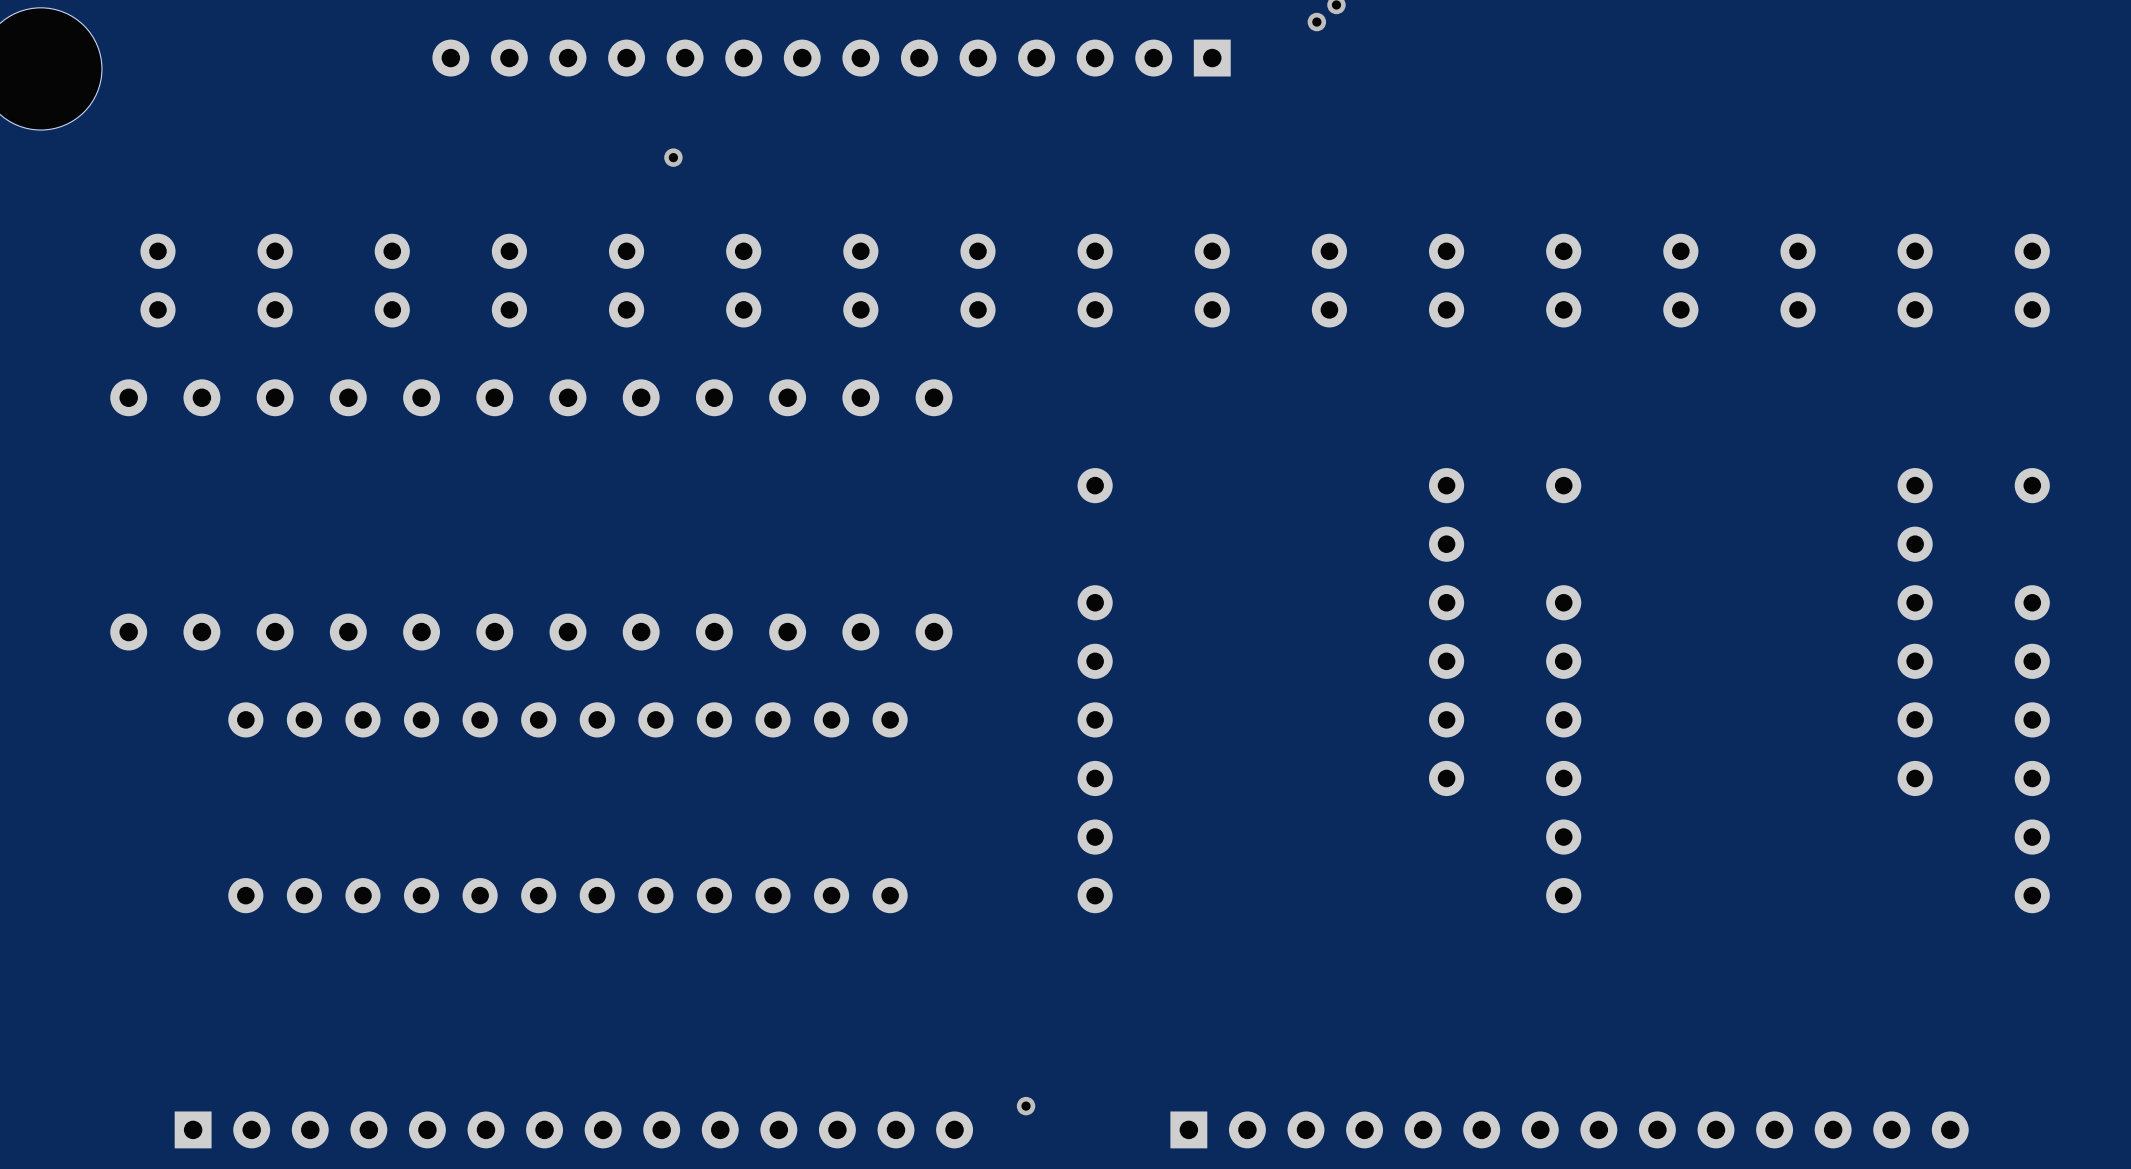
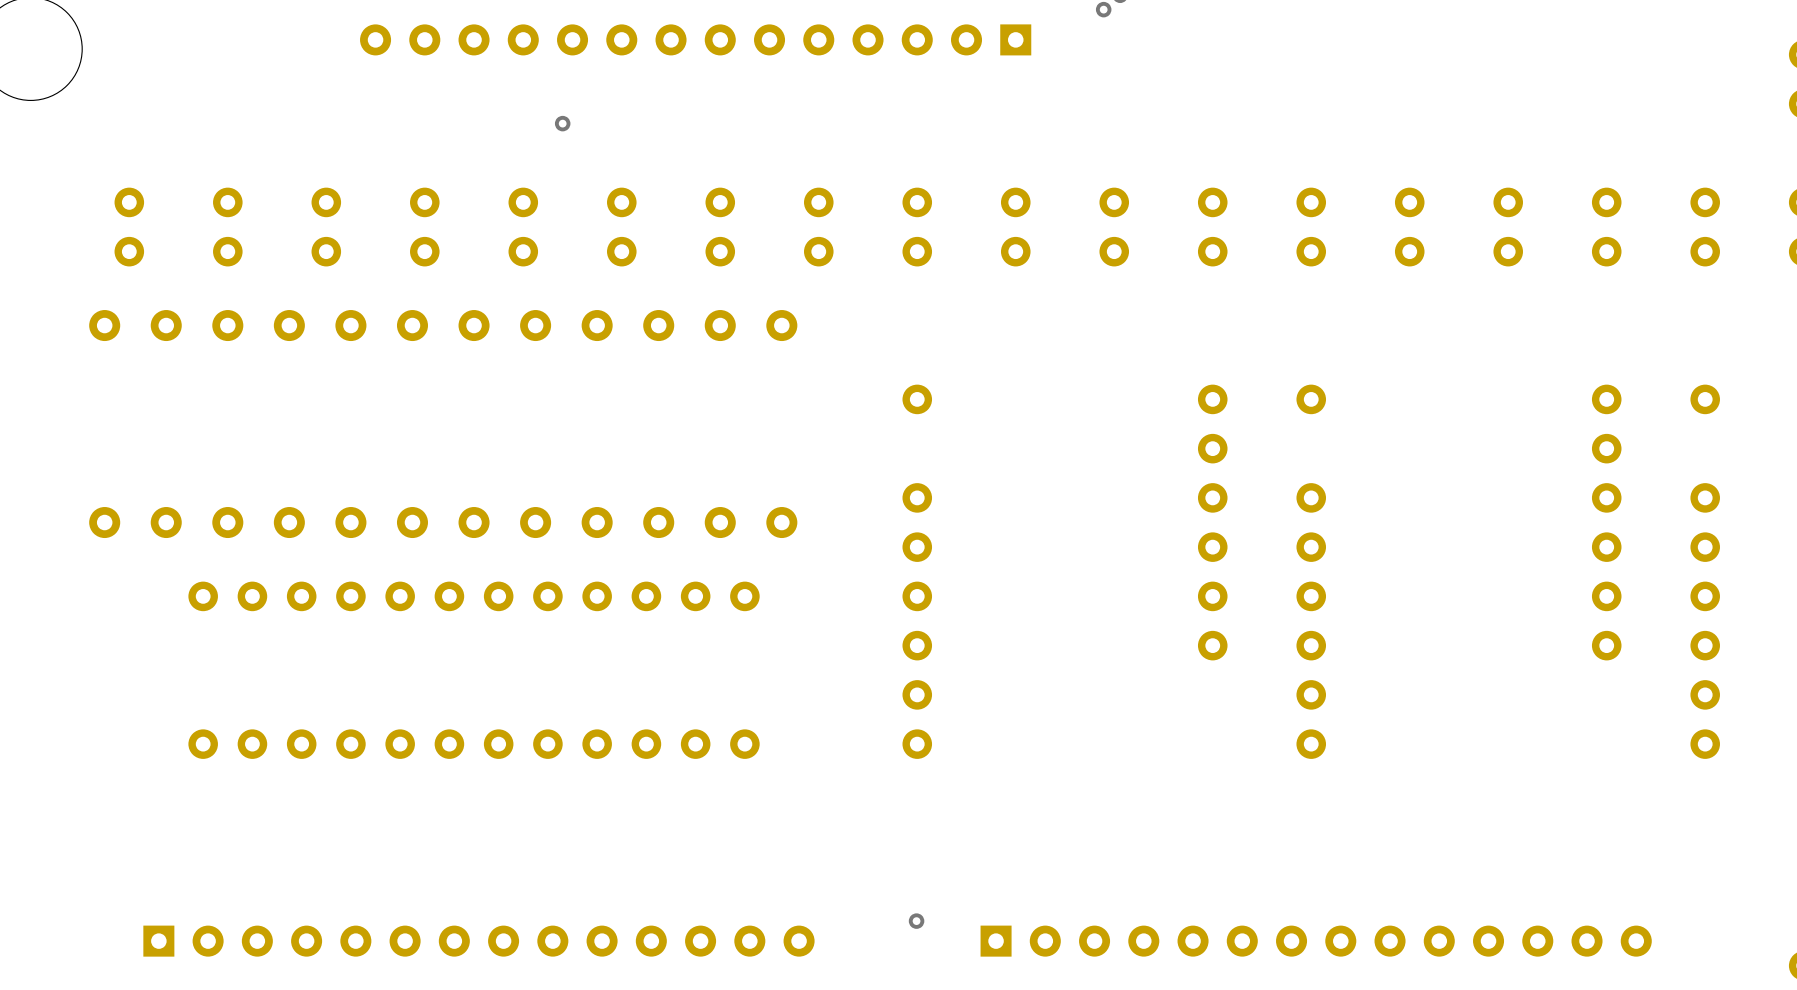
via: (1026, 1106) -> none
via: none -> (916, 921)

